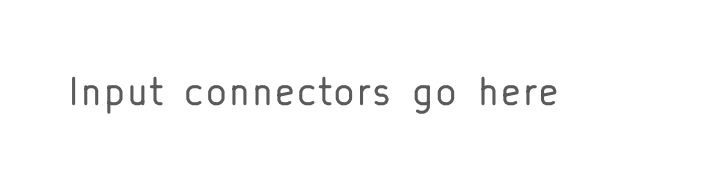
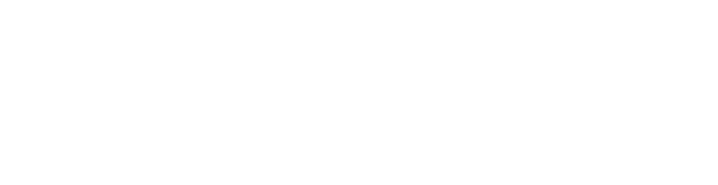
text: Input connectors go here (314, 95) -> none

